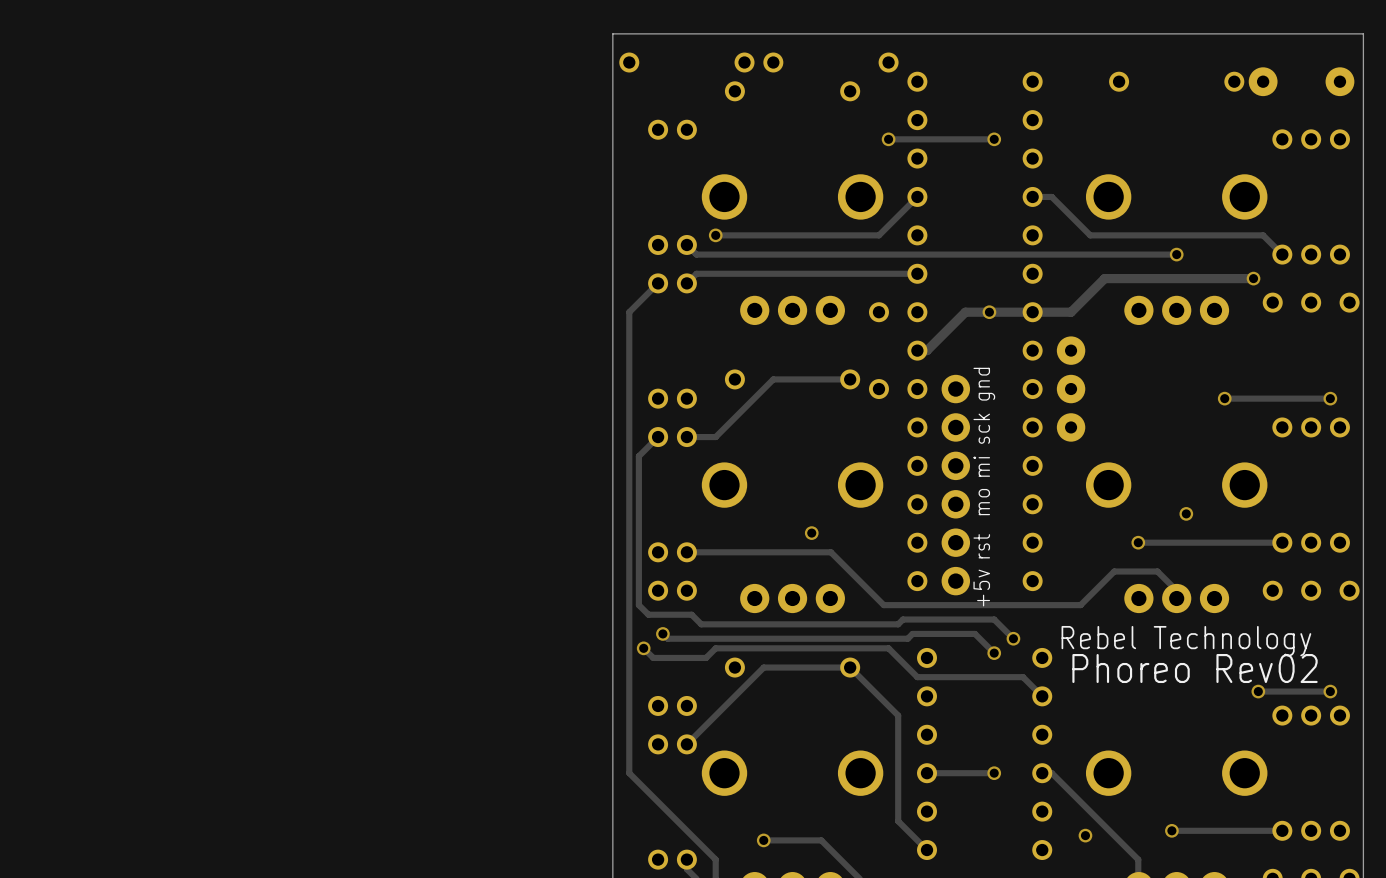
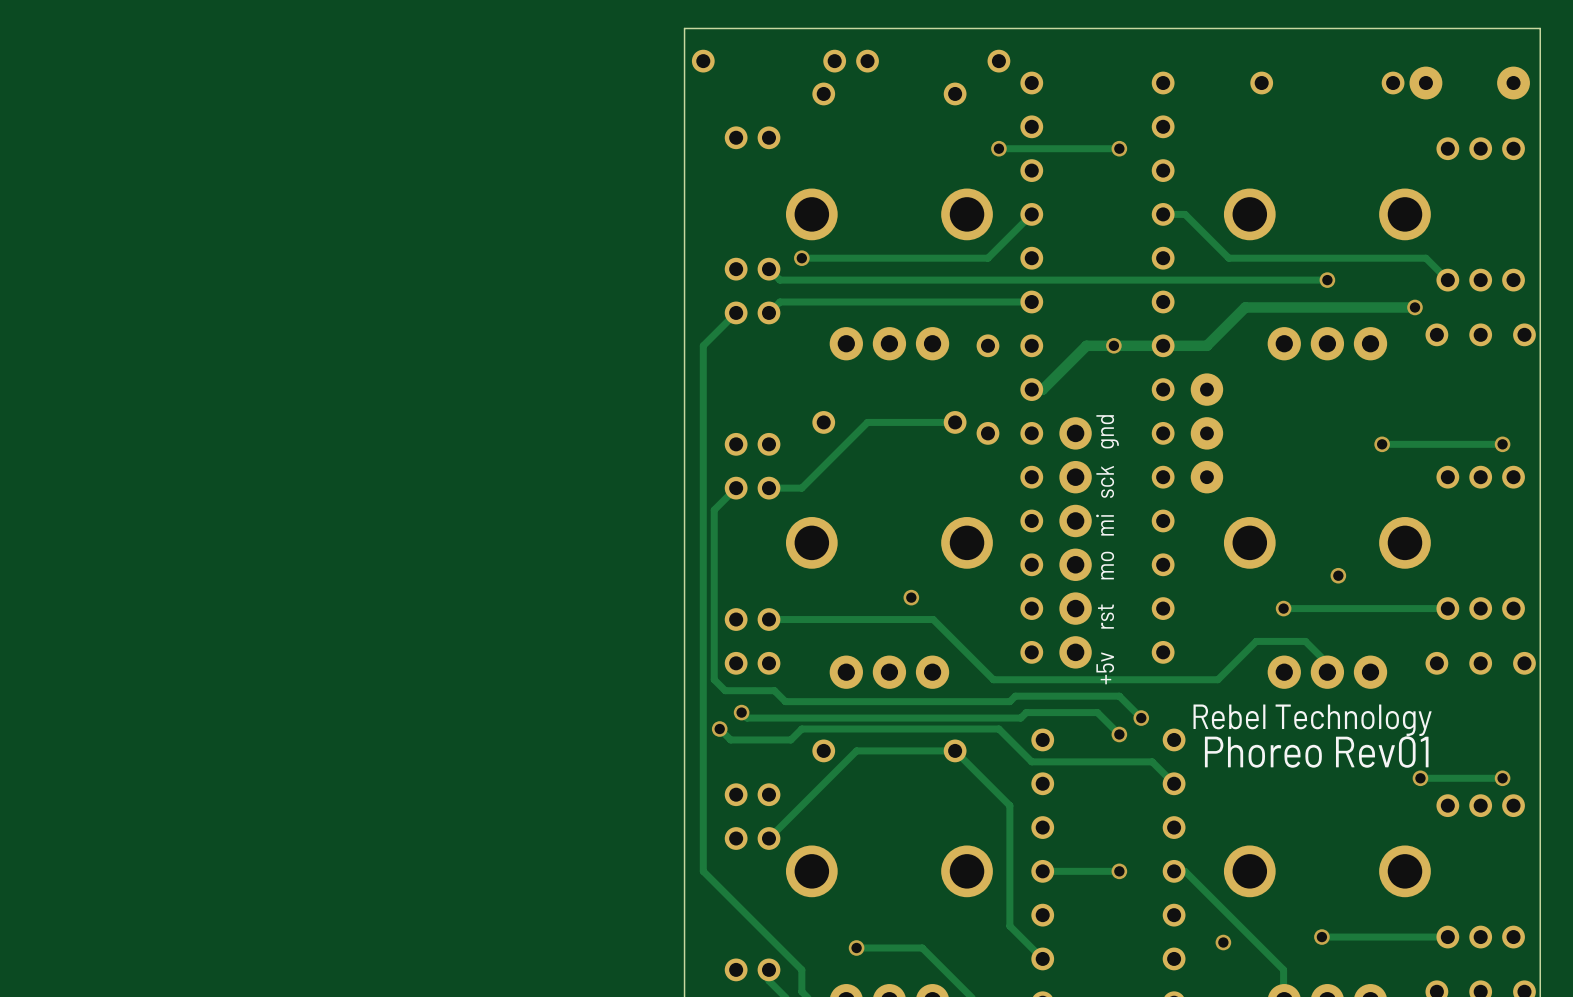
text: Phoreo Rev02 (1195, 668) -> Phoreo Rev01 (1316, 752)

